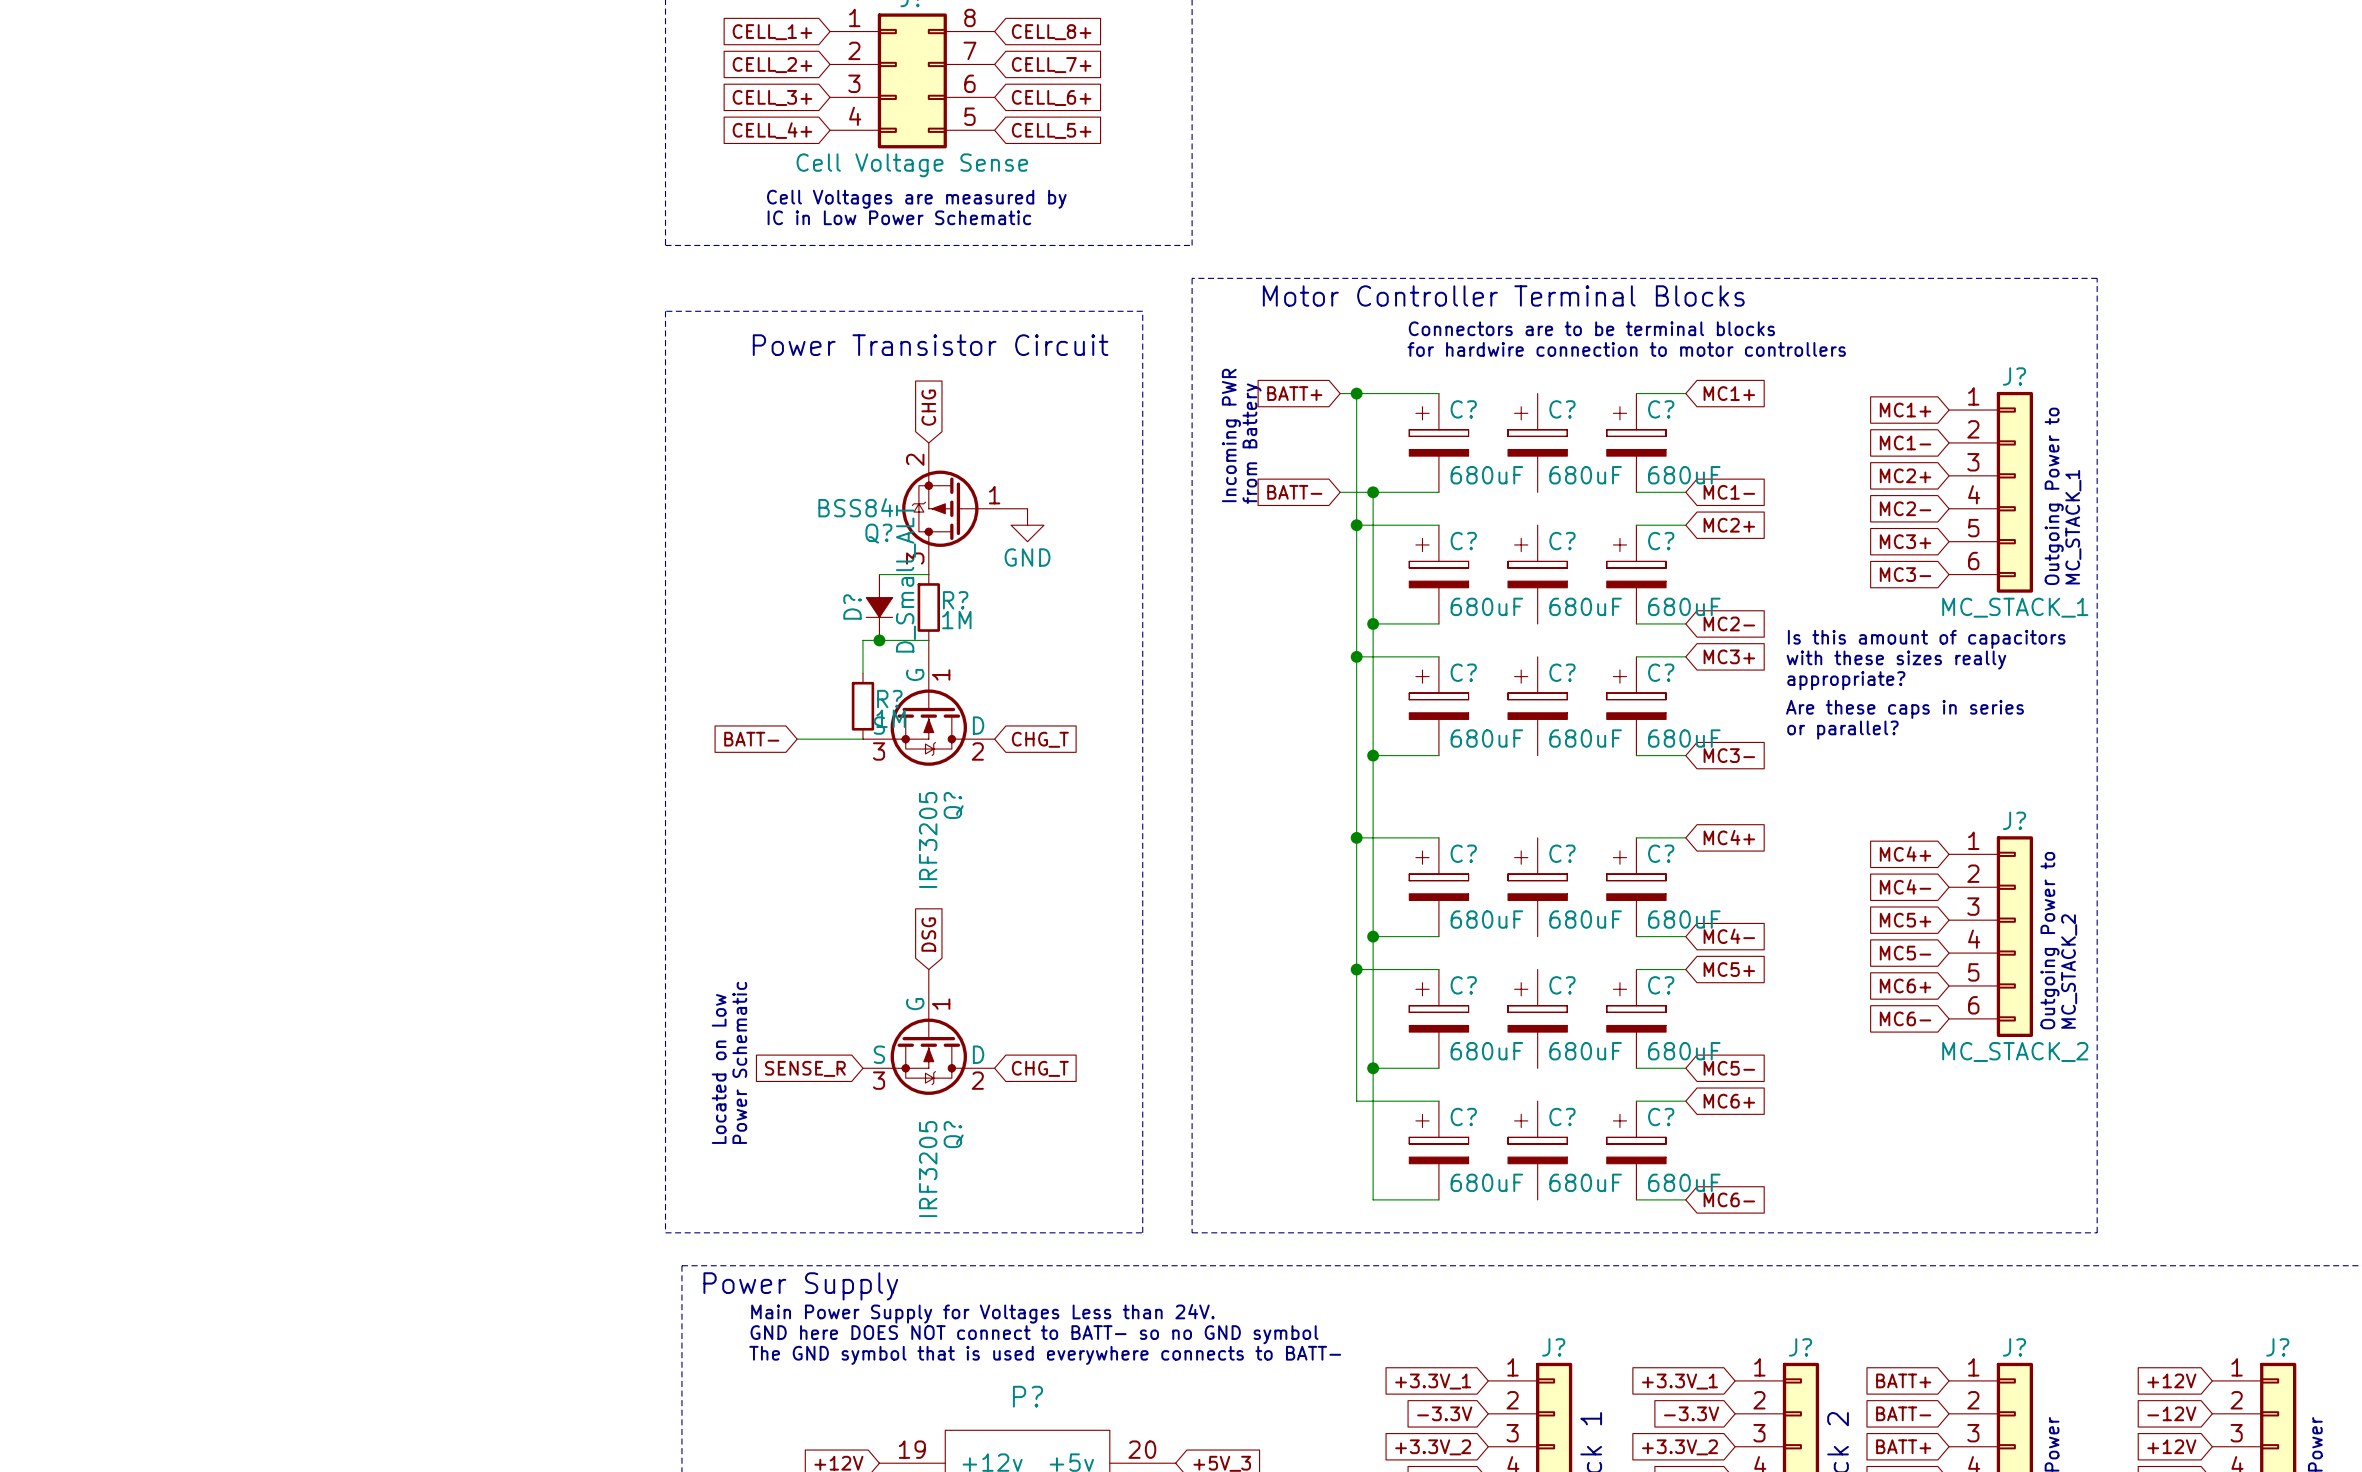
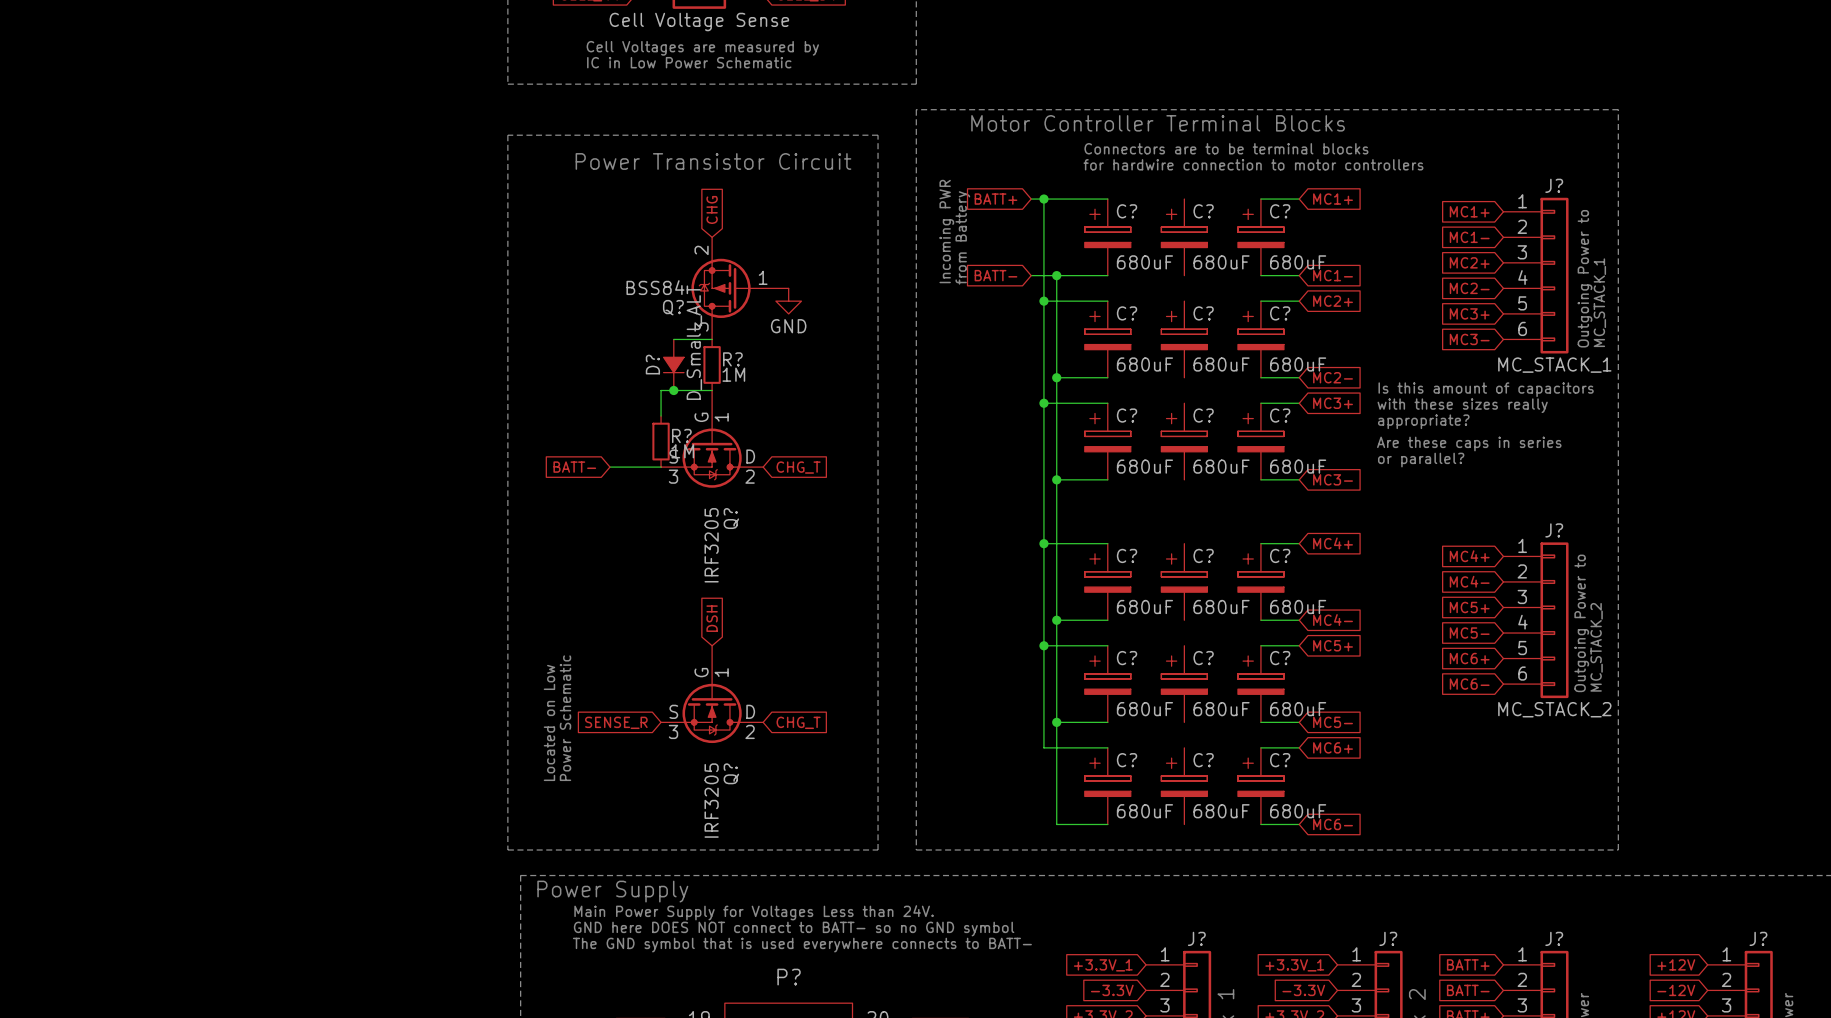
global label: DSG (928, 934) -> DSH (712, 618)

